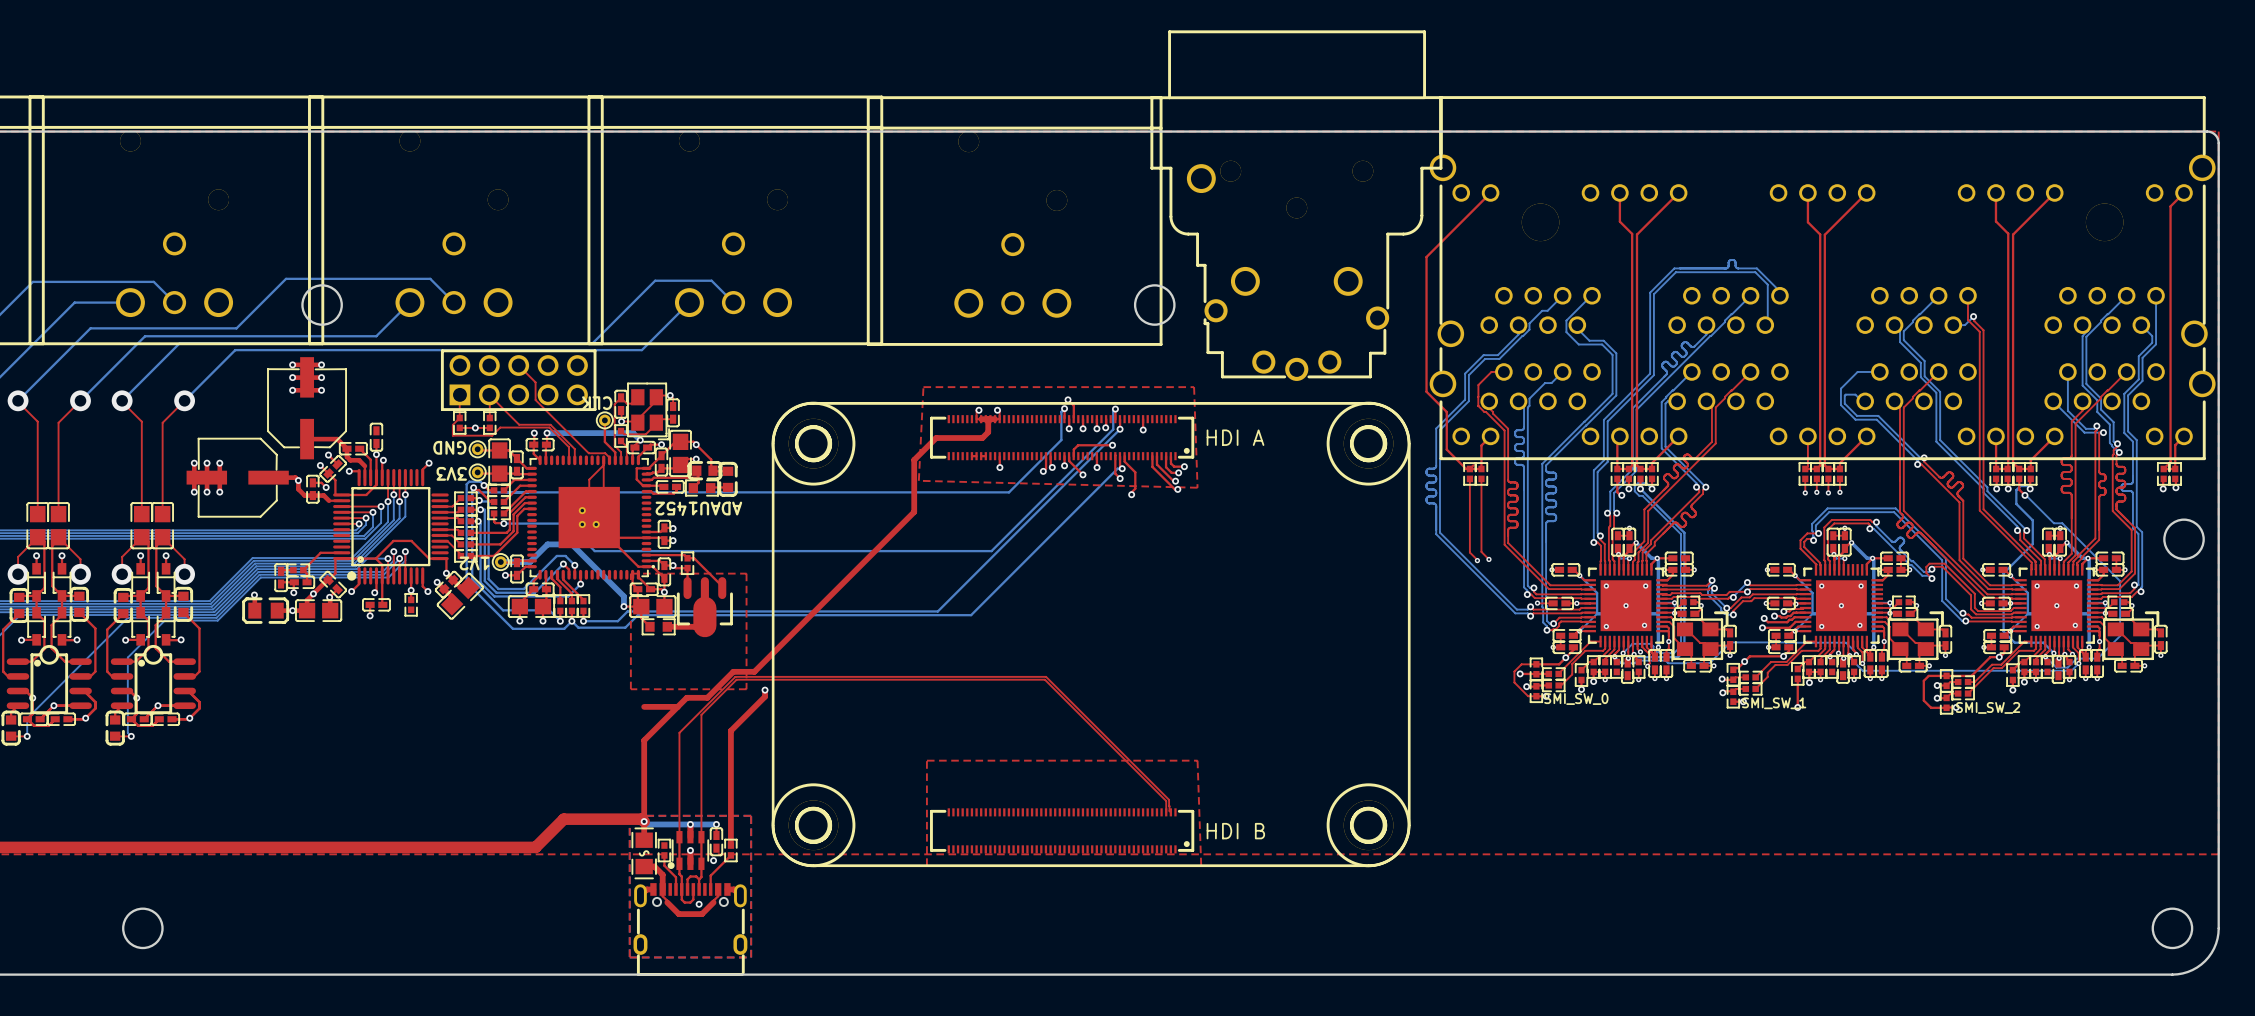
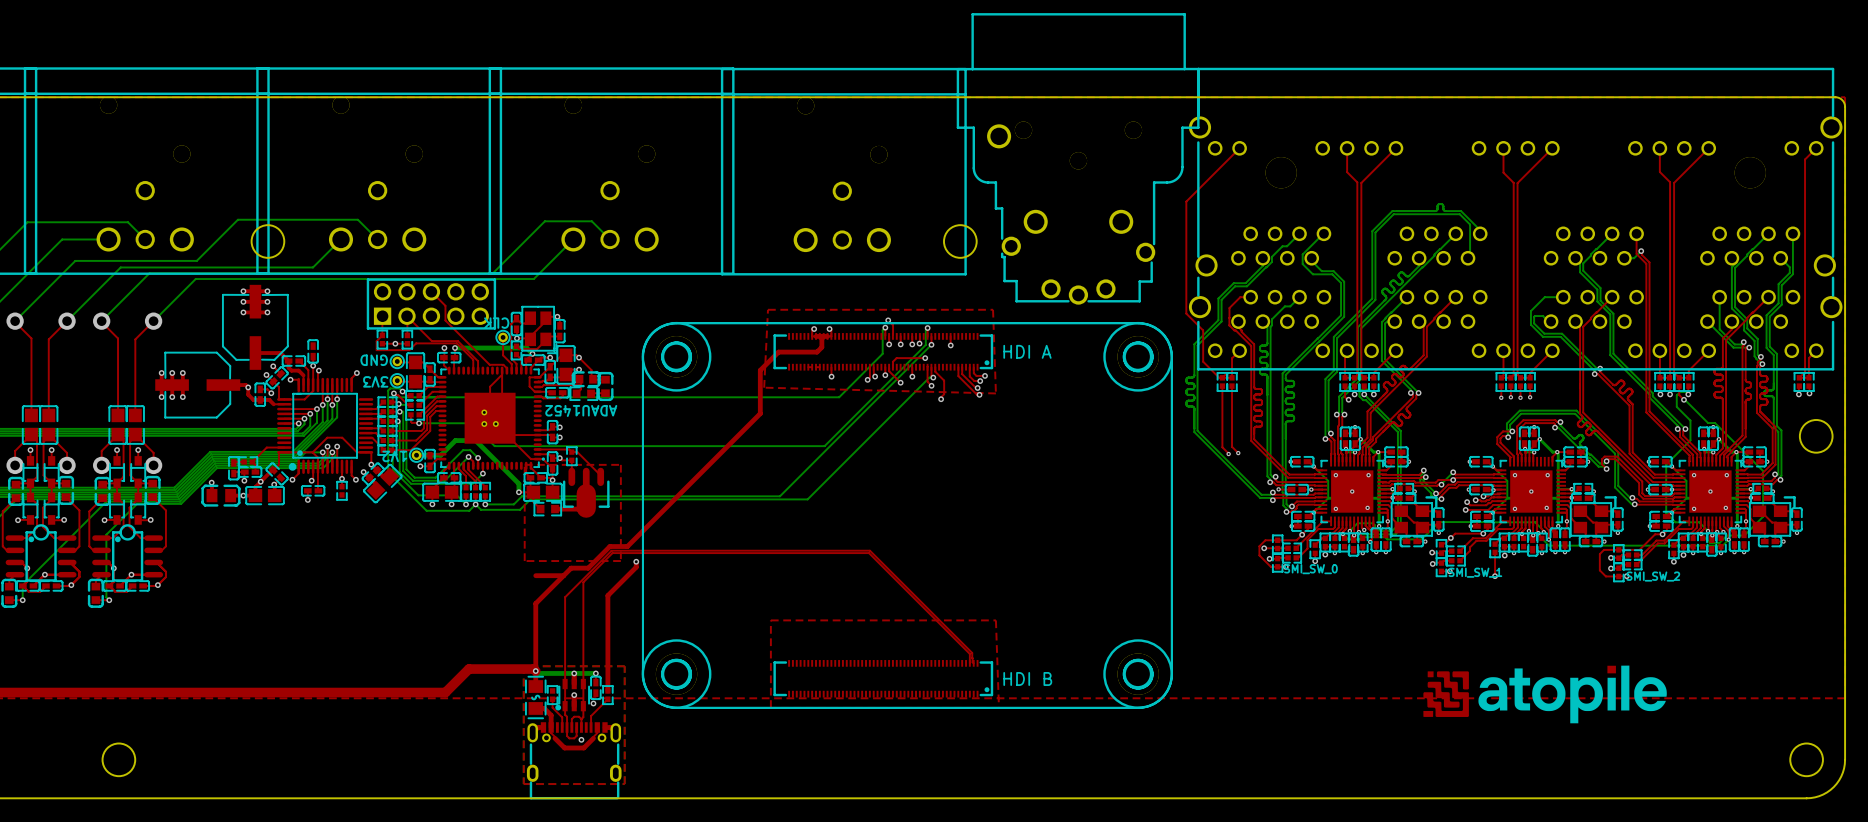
drawing: none -> [1423, 665, 1667, 724]

